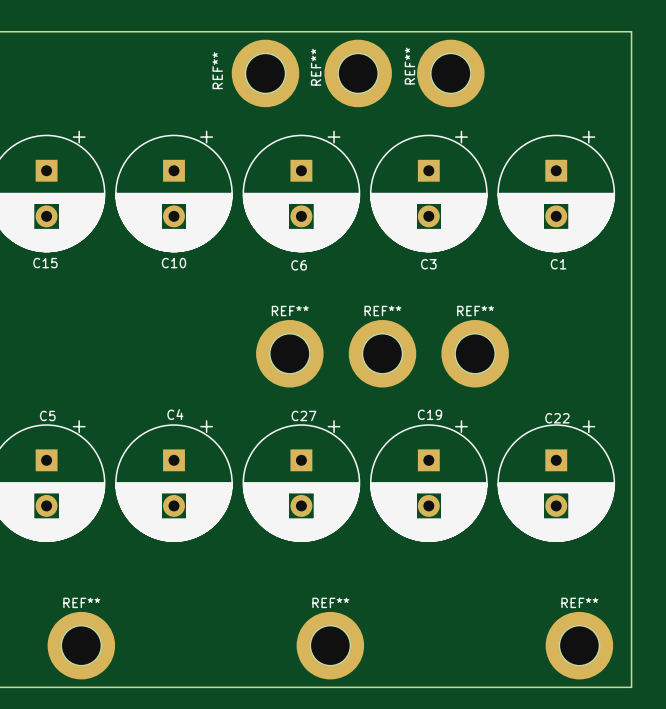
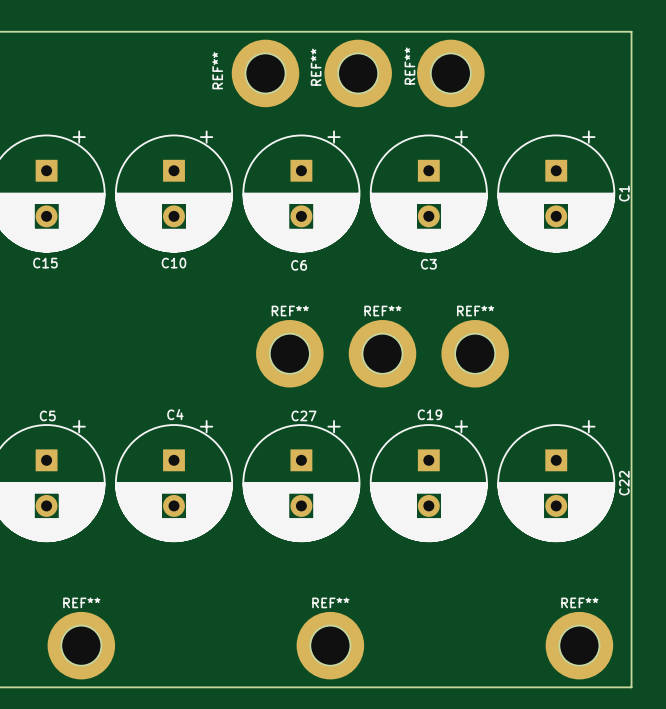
C1 name rotation: 0° (558, 264) -> 90° counterclockwise (624, 193)
C1 name position: C1 (558, 264) -> C1 (624, 193)
C22 name rotation: 0° (557, 418) -> 90° counterclockwise (624, 483)
C22 name position: C22 (557, 418) -> C22 (624, 483)

